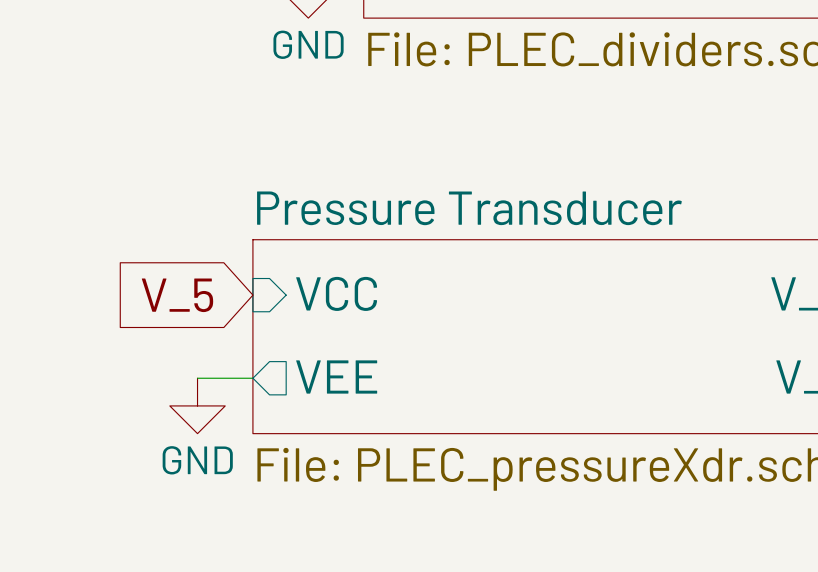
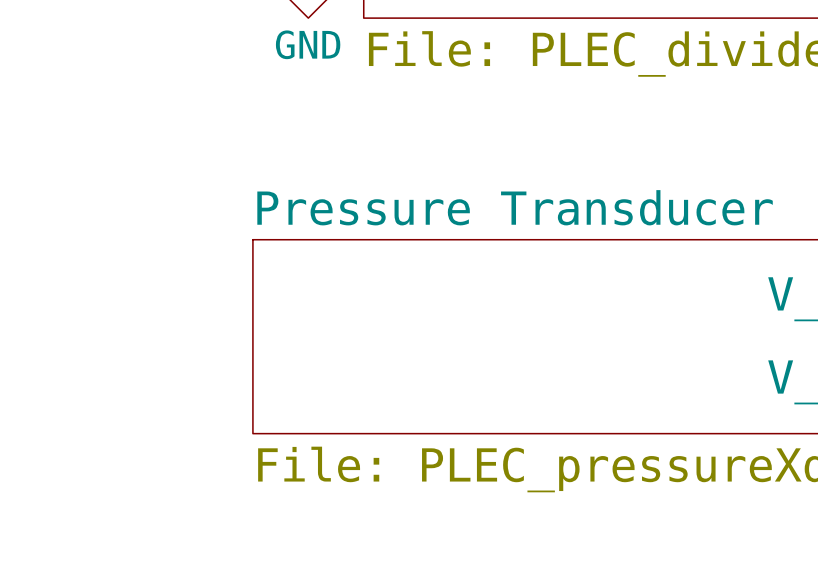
sheet pin: VCC (336, 293) -> none
global label: V_5 (177, 295) -> none
sheet pin: VEE (336, 376) -> none
wire: (197, 378) (252, 378) -> none
power symbol: GND (197, 405) -> none

